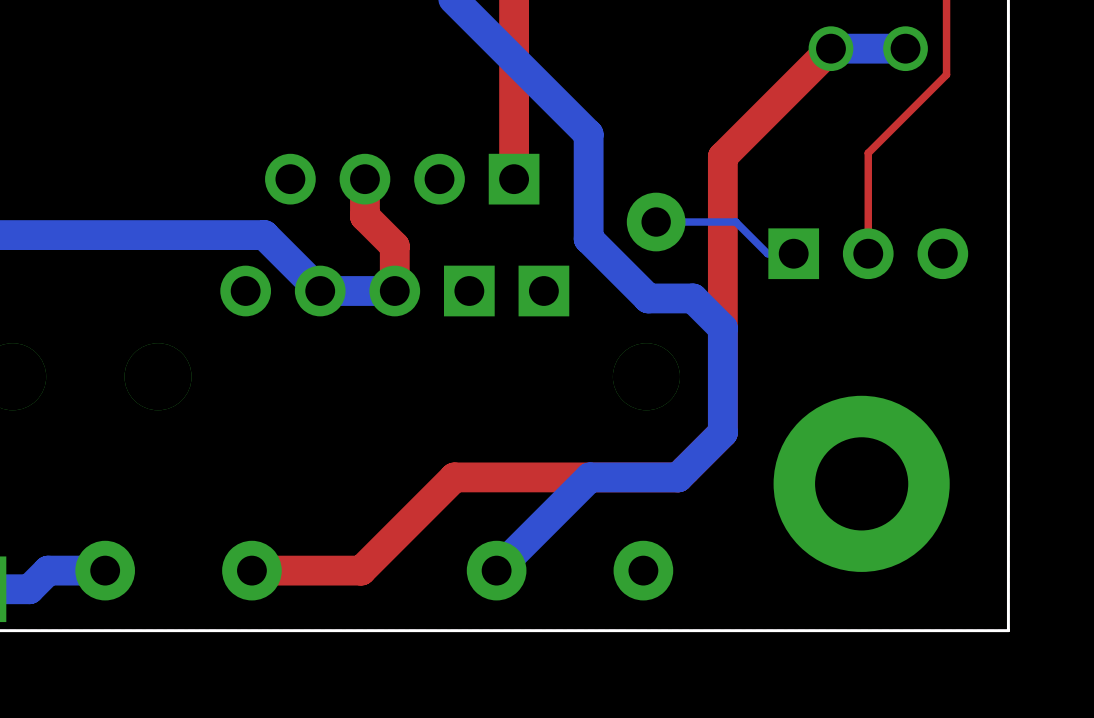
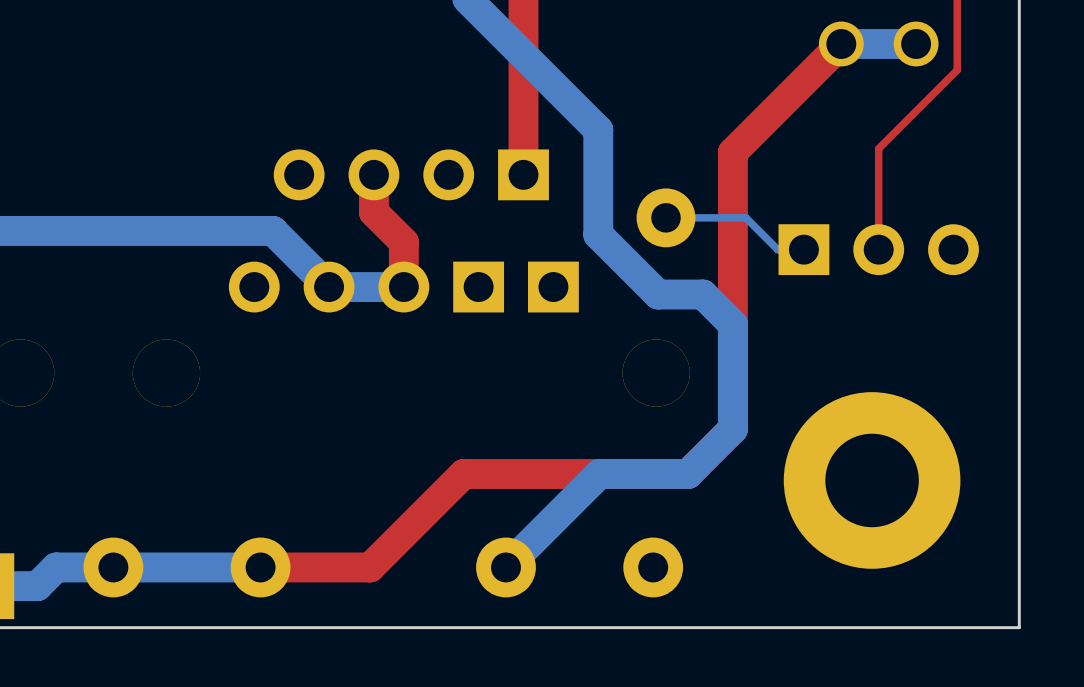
bottom track: none -> (260, 567) (113, 567)

